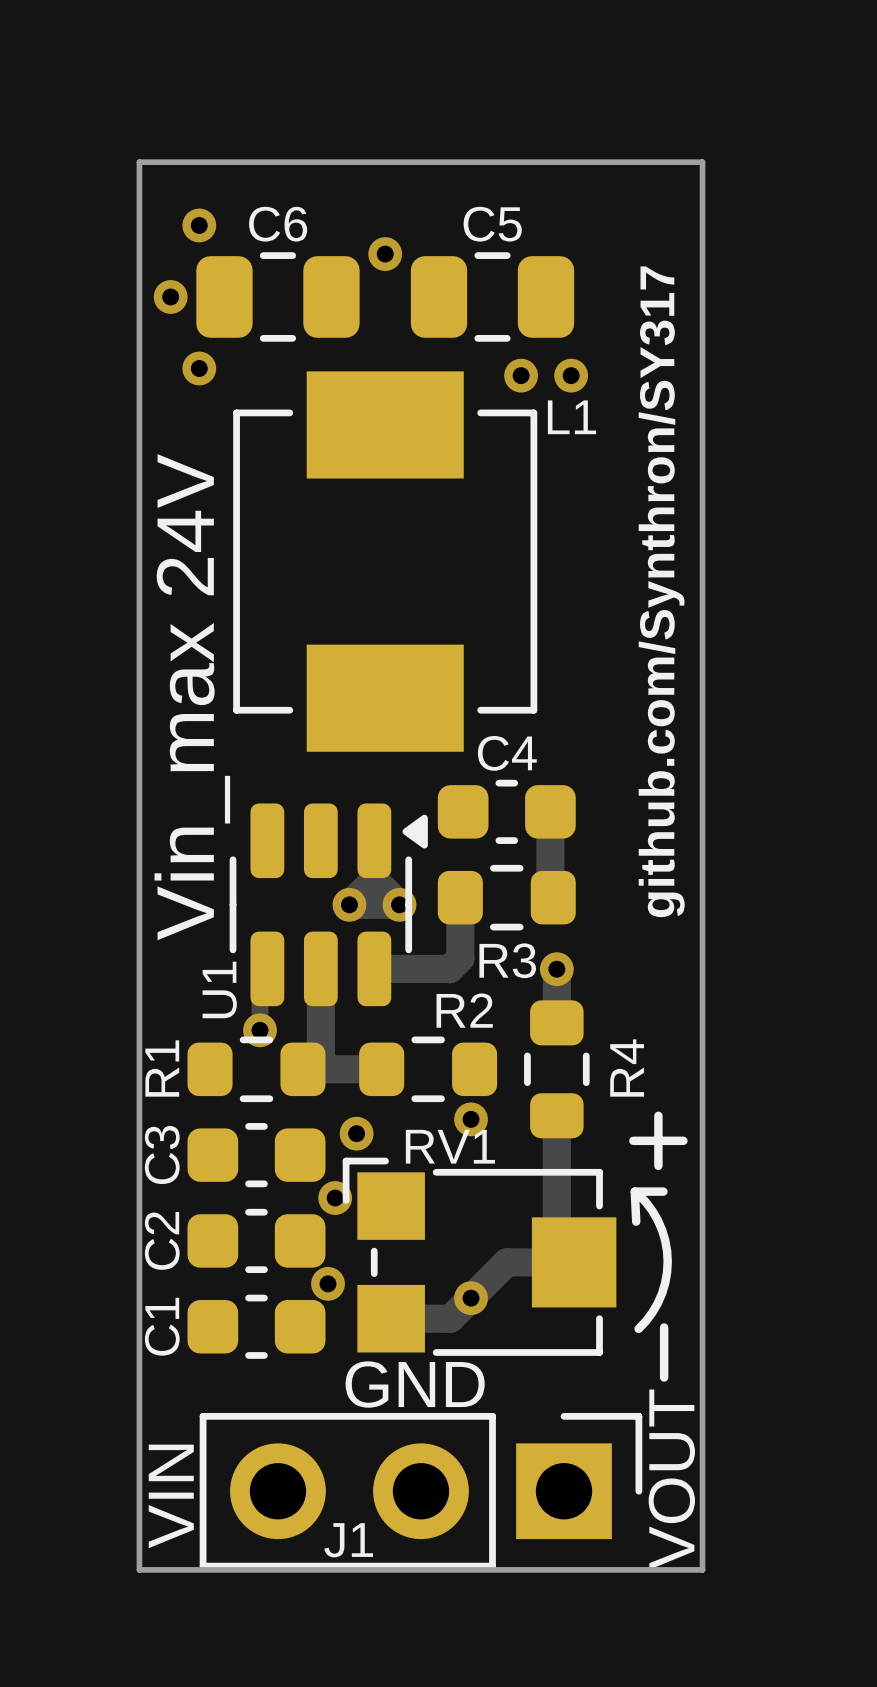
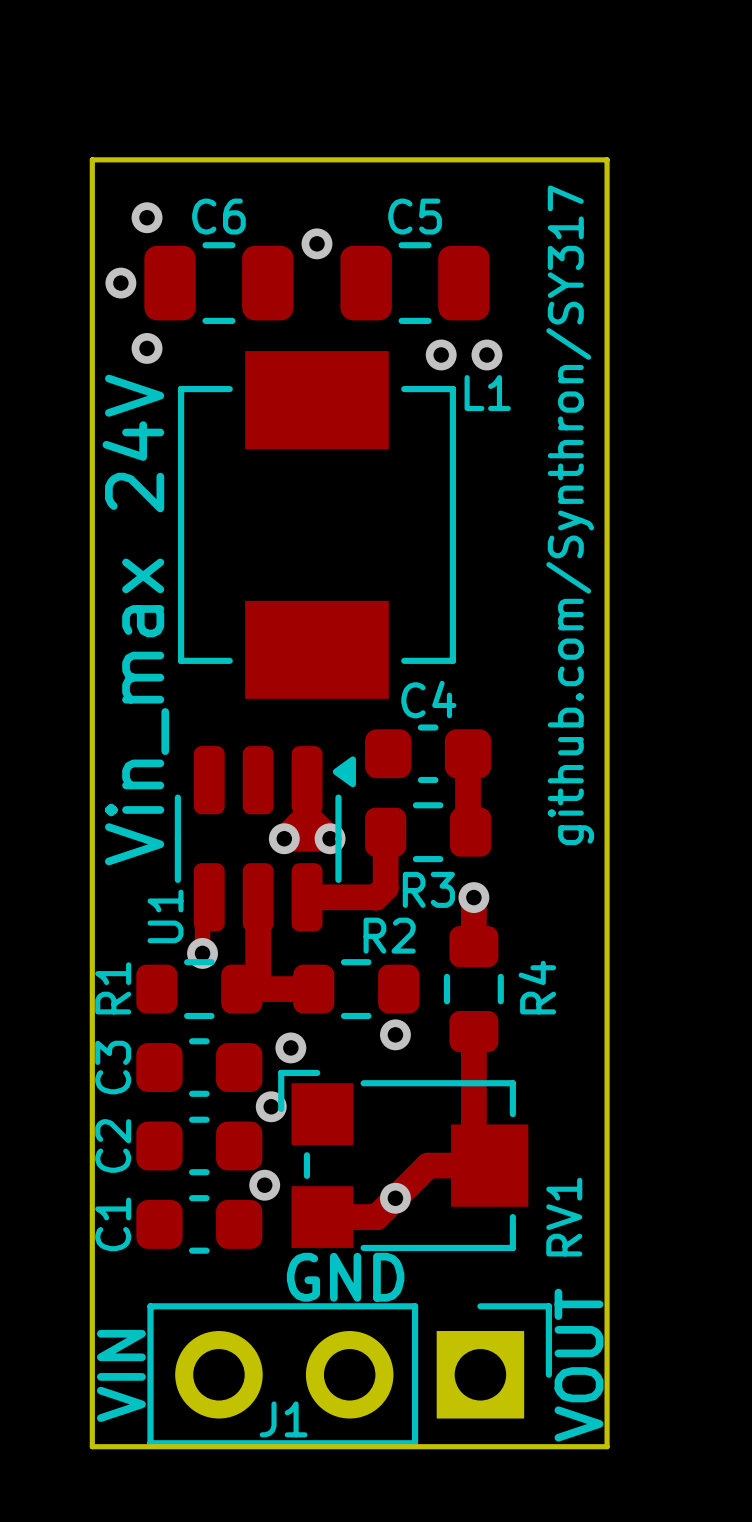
line: (658, 1115) (658, 1165) -> none
line: (633, 1140) (683, 1140) -> none
RV1 name rotation: 0° (450, 1146) -> 90° counterclockwise (564, 1217)
RV1 name position: RV1 (450, 1146) -> RV1 (564, 1217)
line: (663, 1191) (634, 1191) (636, 1221) -> none
line: (638, 1194) (652, 1210) (662, 1230) (667, 1261) (665, 1283) (657, 1303) (638, 1328) -> none
line: (664, 1327) (664, 1377) -> none

